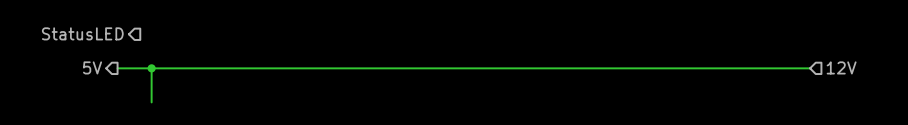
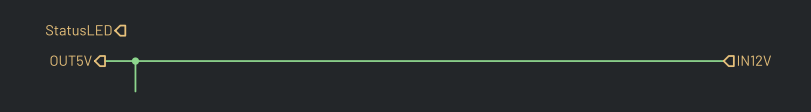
hierarchical label: 5V (92, 67) -> OUT5V (71, 60)
hierarchical label: 12V (841, 67) -> IN12V (754, 60)

